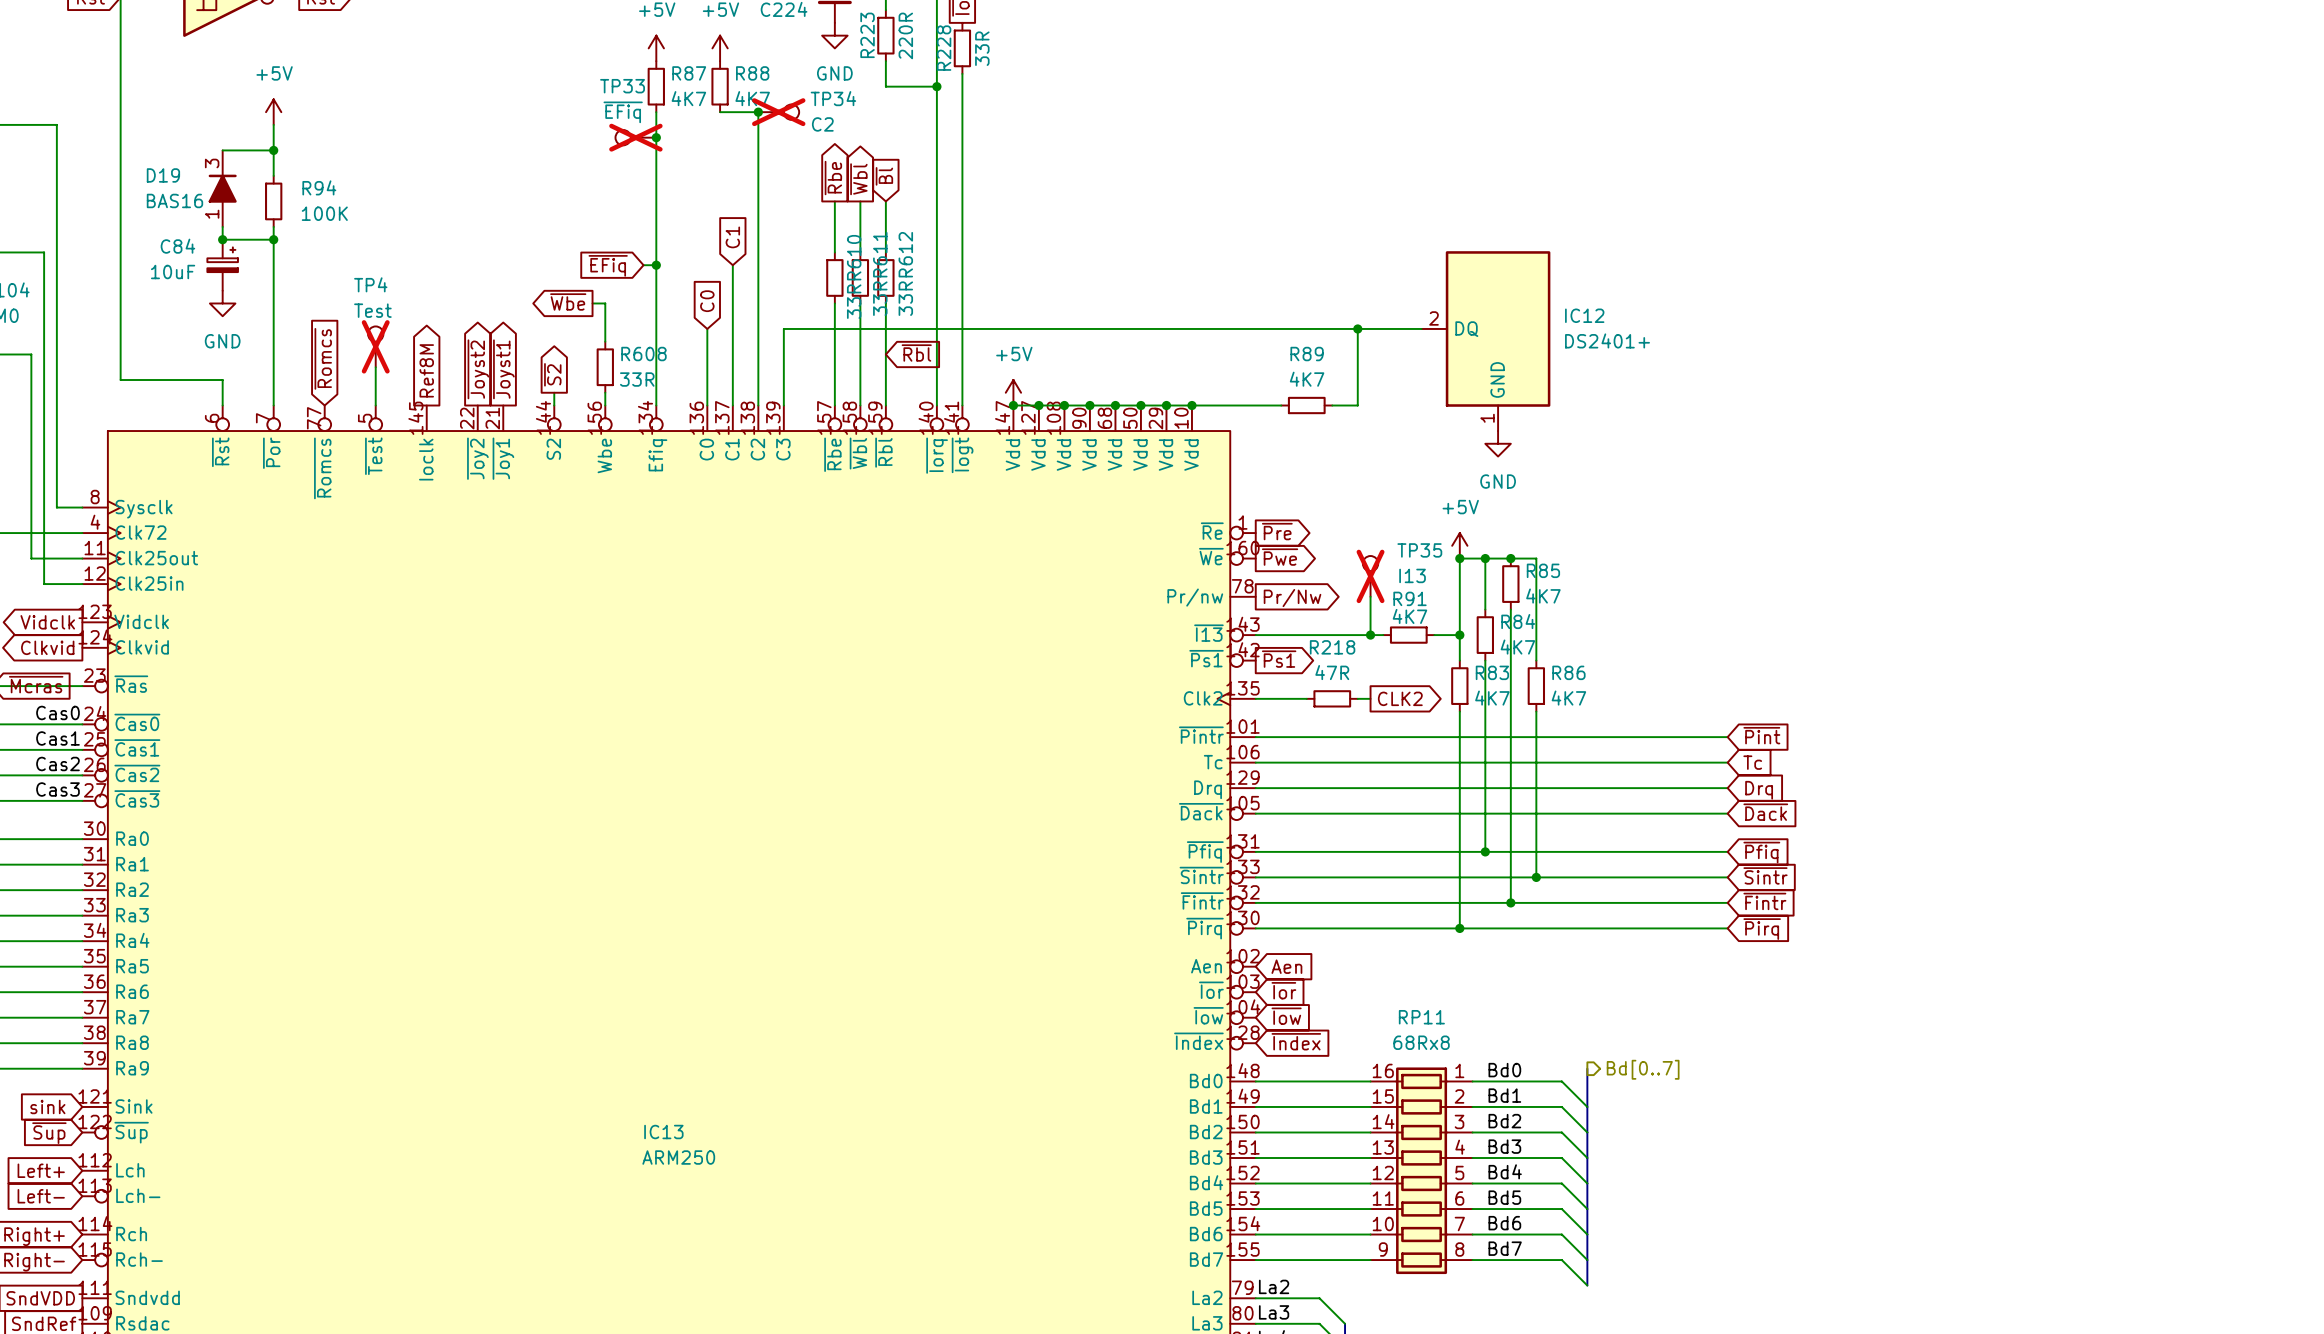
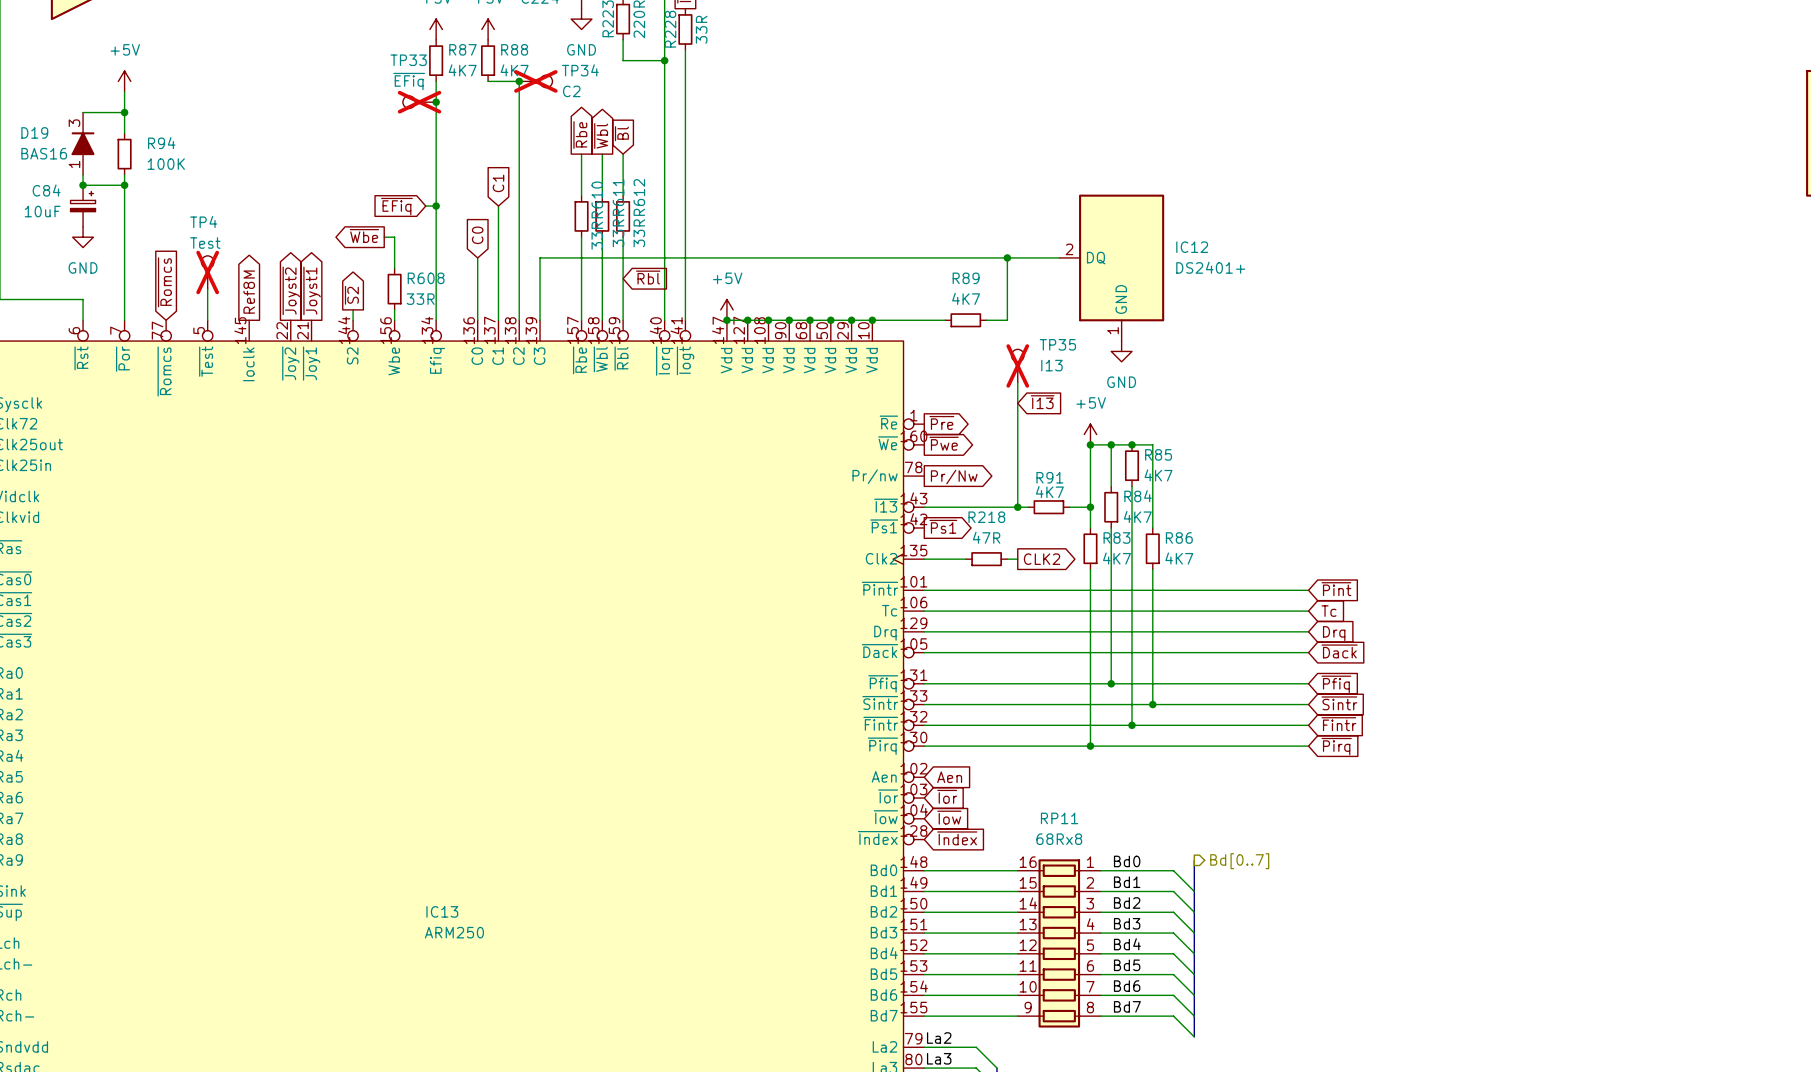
wire: none -> (1017, 382) (1017, 476)
global label: none -> ~{I13} (1042, 402)
TP35 position: (1370, 576) -> (1017, 365)

